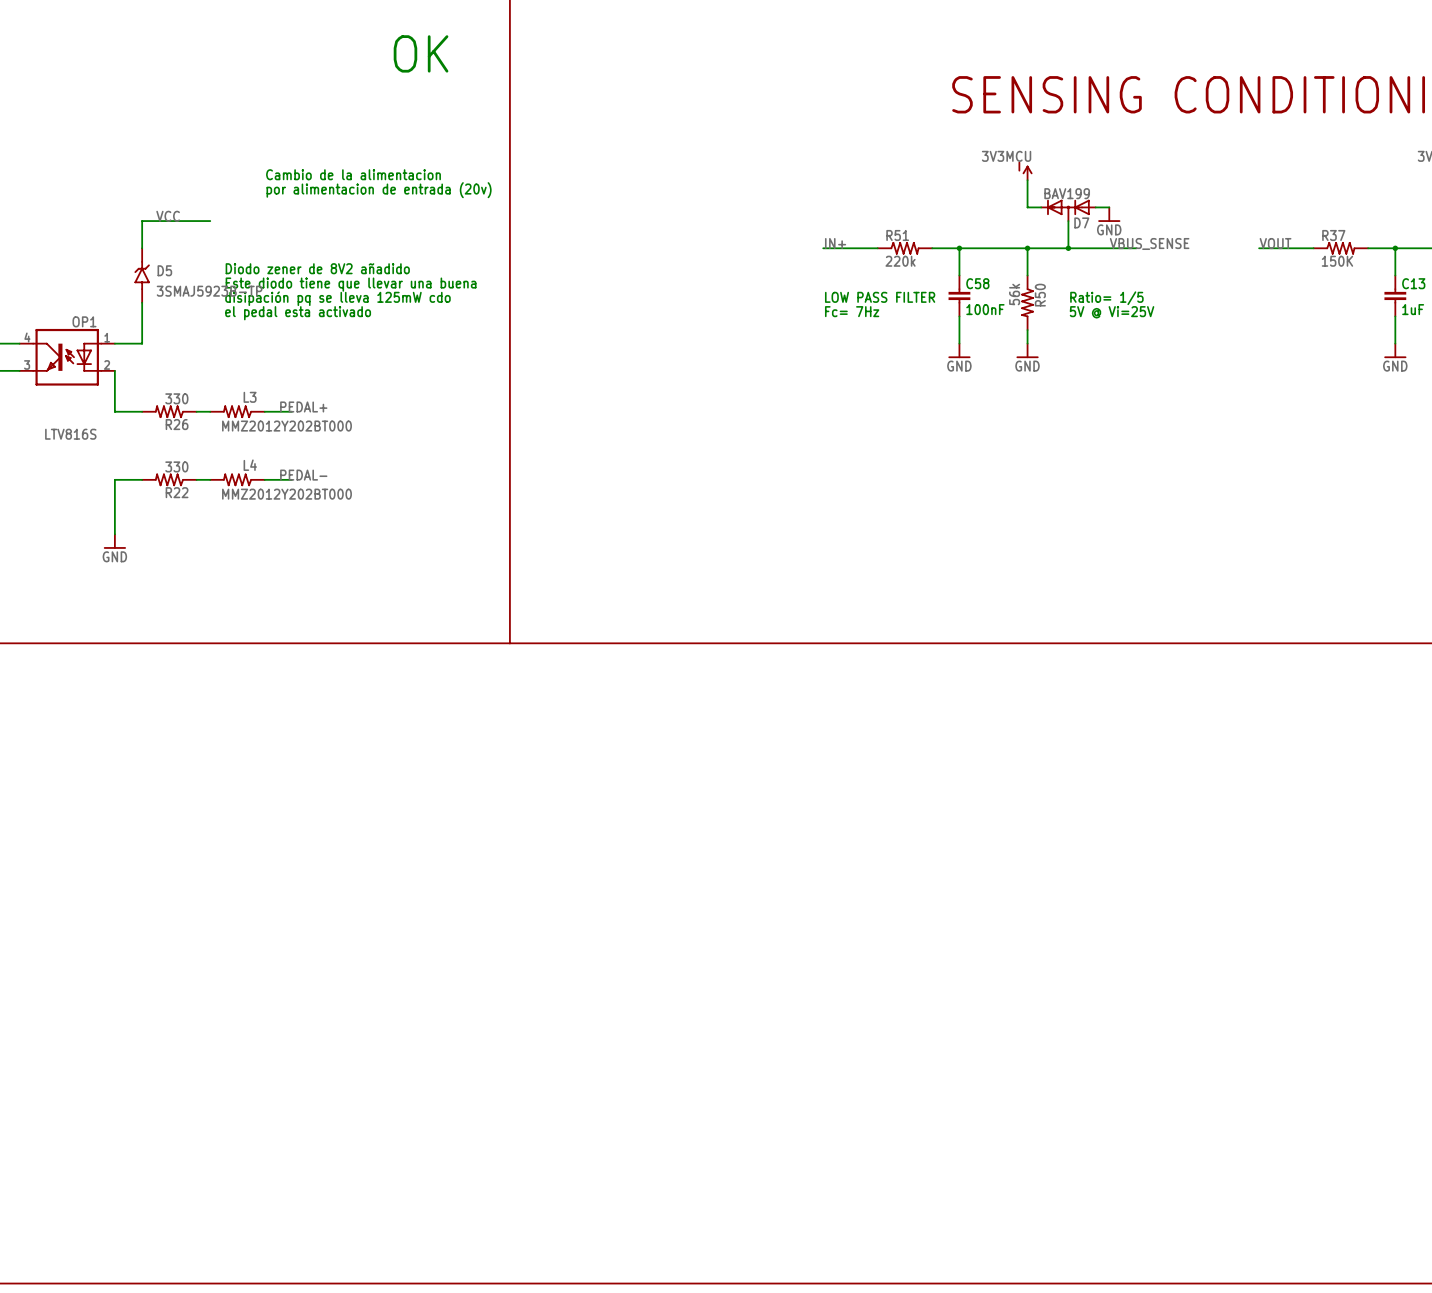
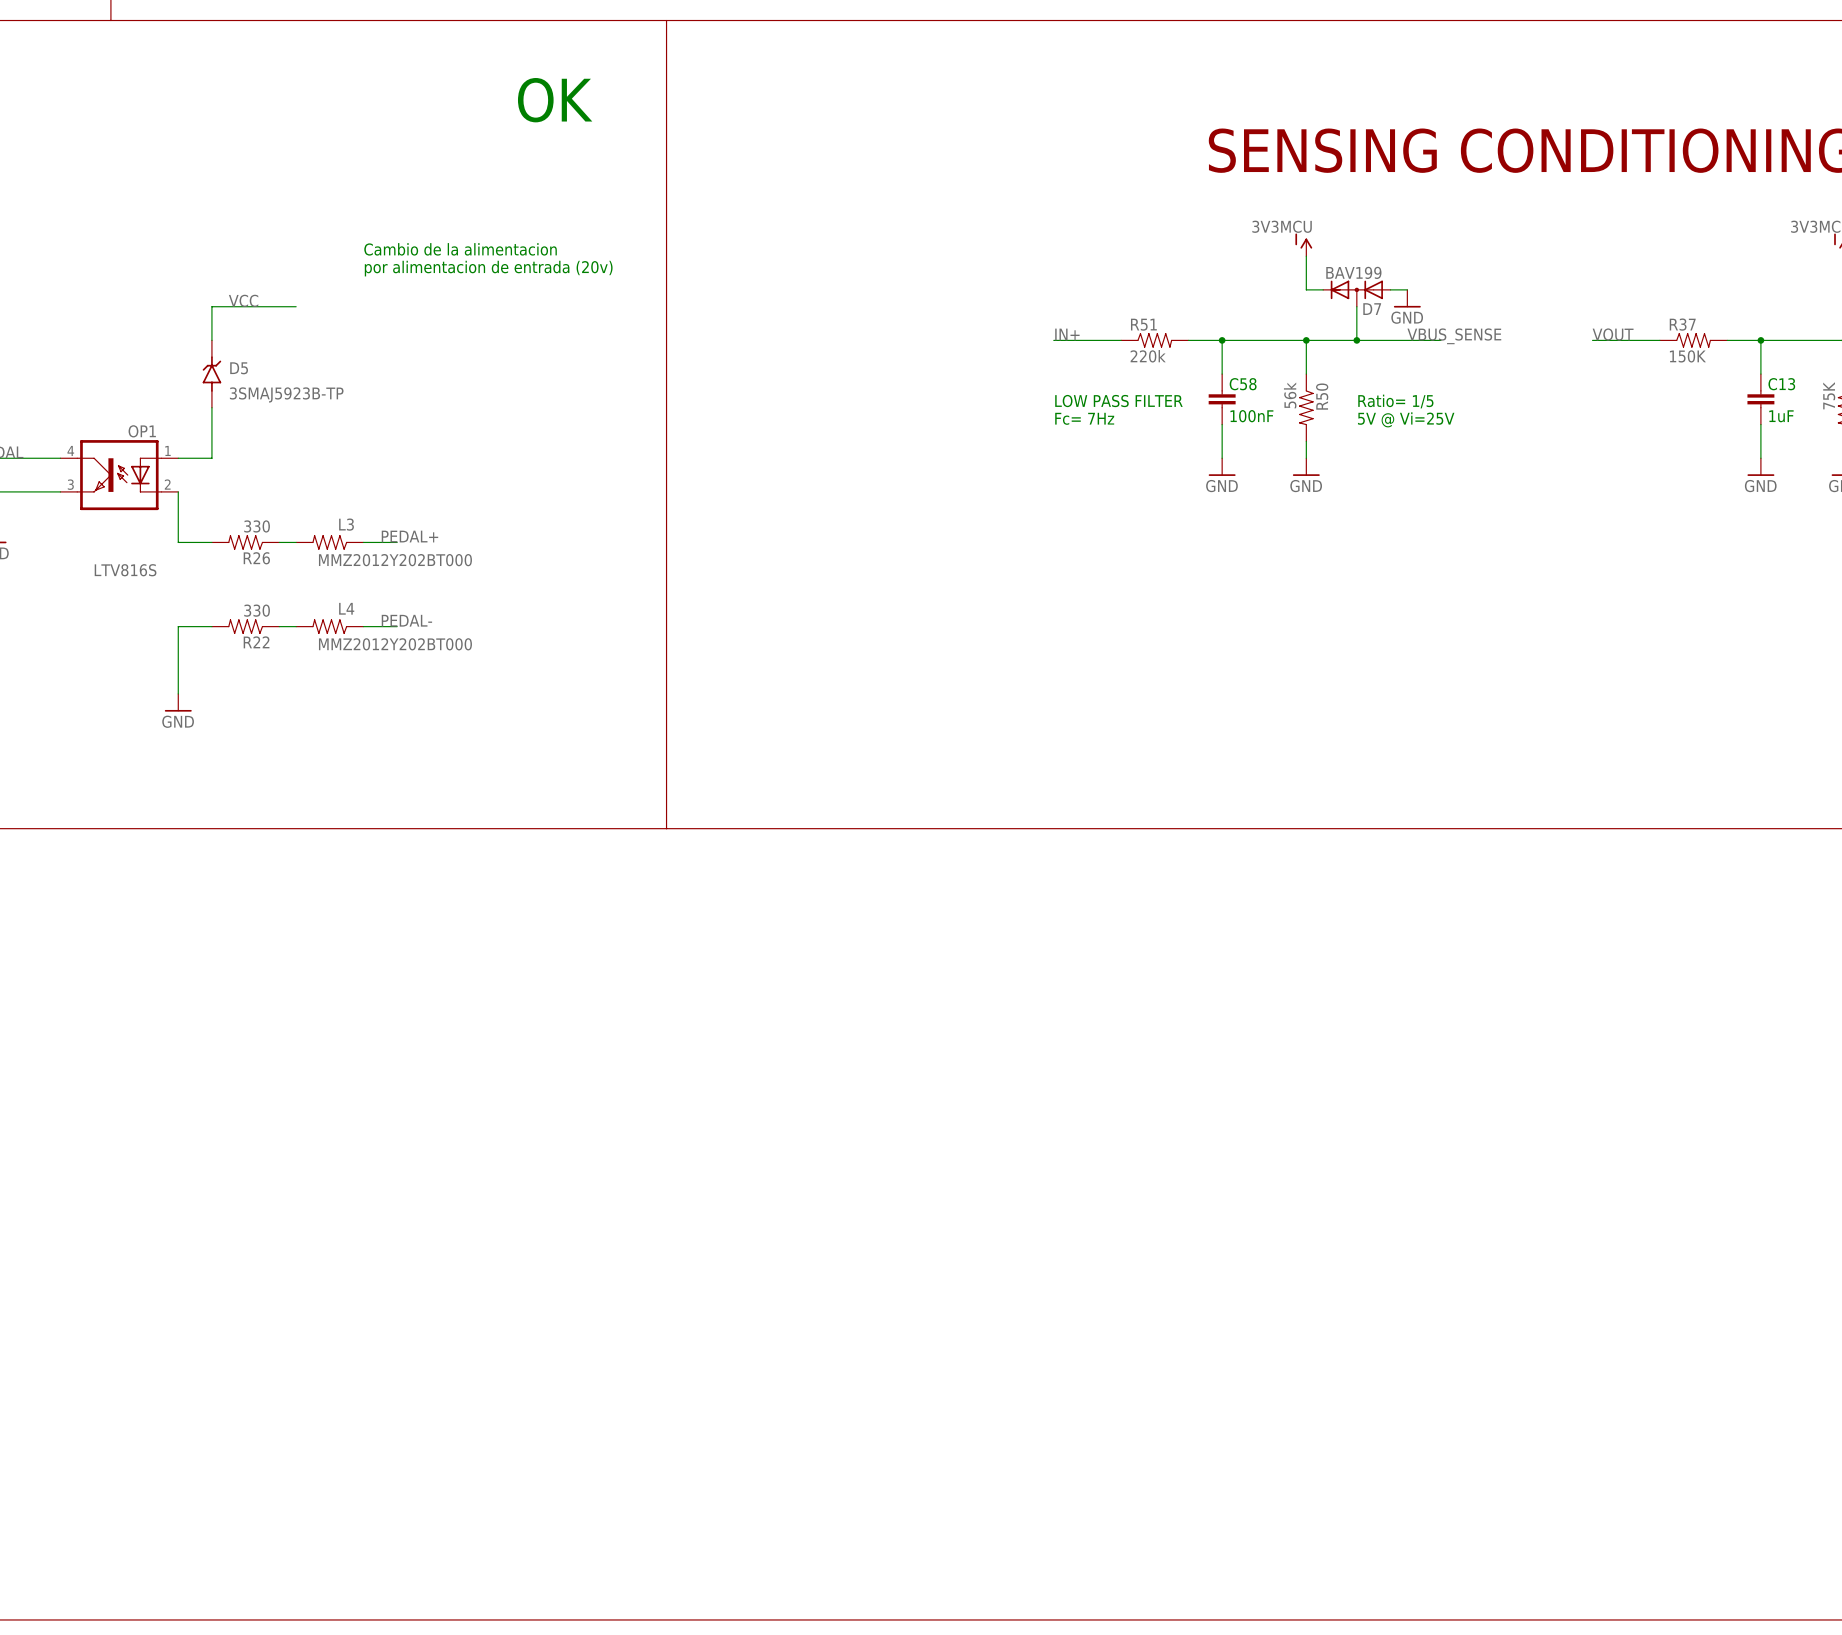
text: Diodo zener de 8V2 añadido (317, 268) -> none
text: Este diodo tiene que llevar una buena (351, 284) -> none
text: disipación pq se lleva 125mW cdo (337, 298) -> none
text: el pedal esta activado (298, 313) -> none

